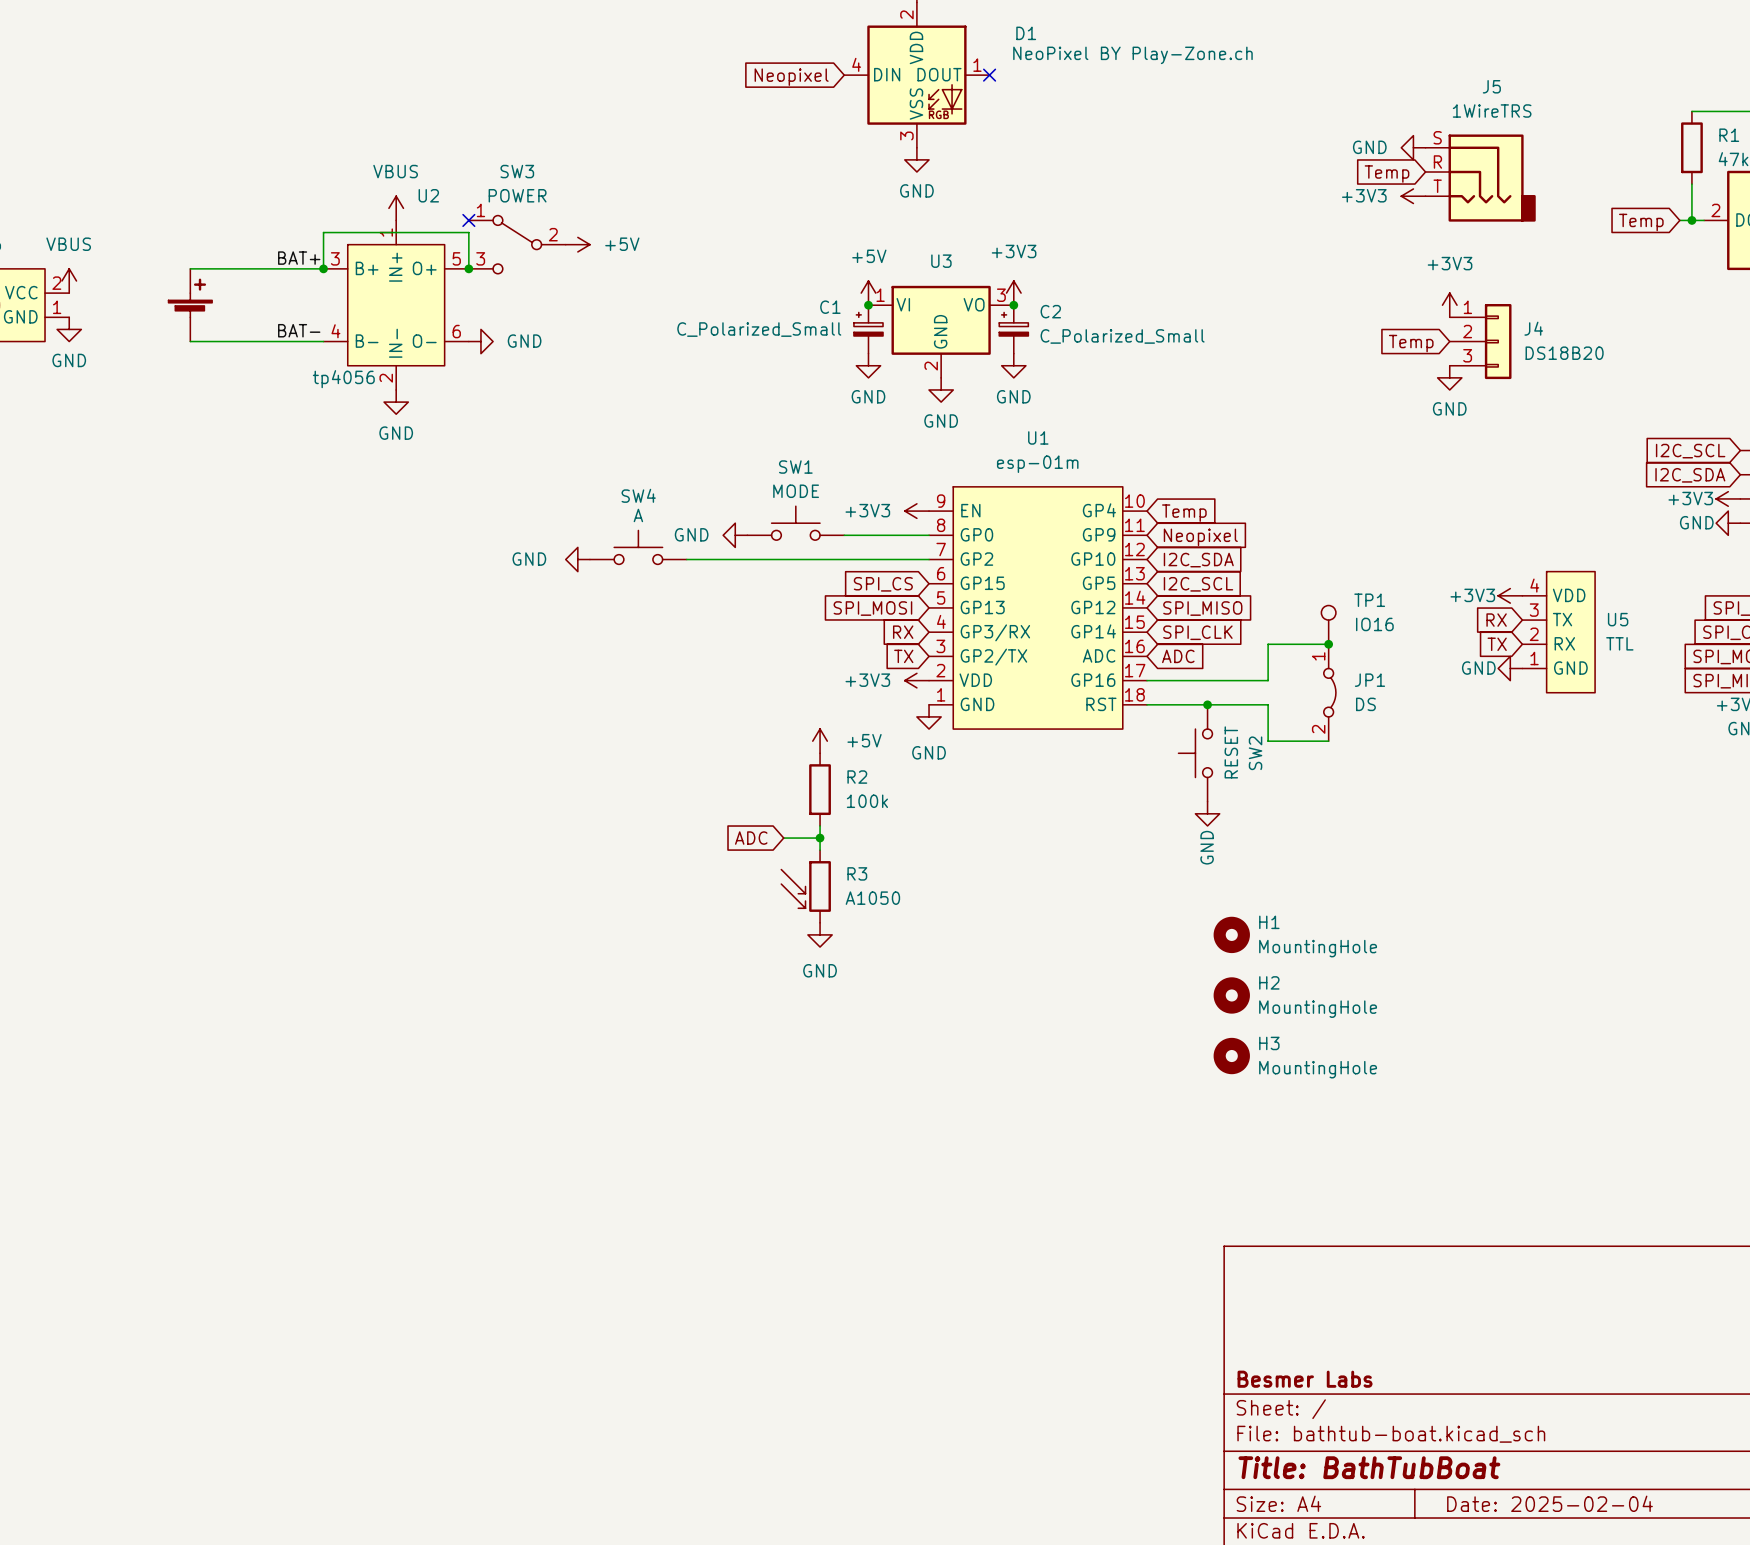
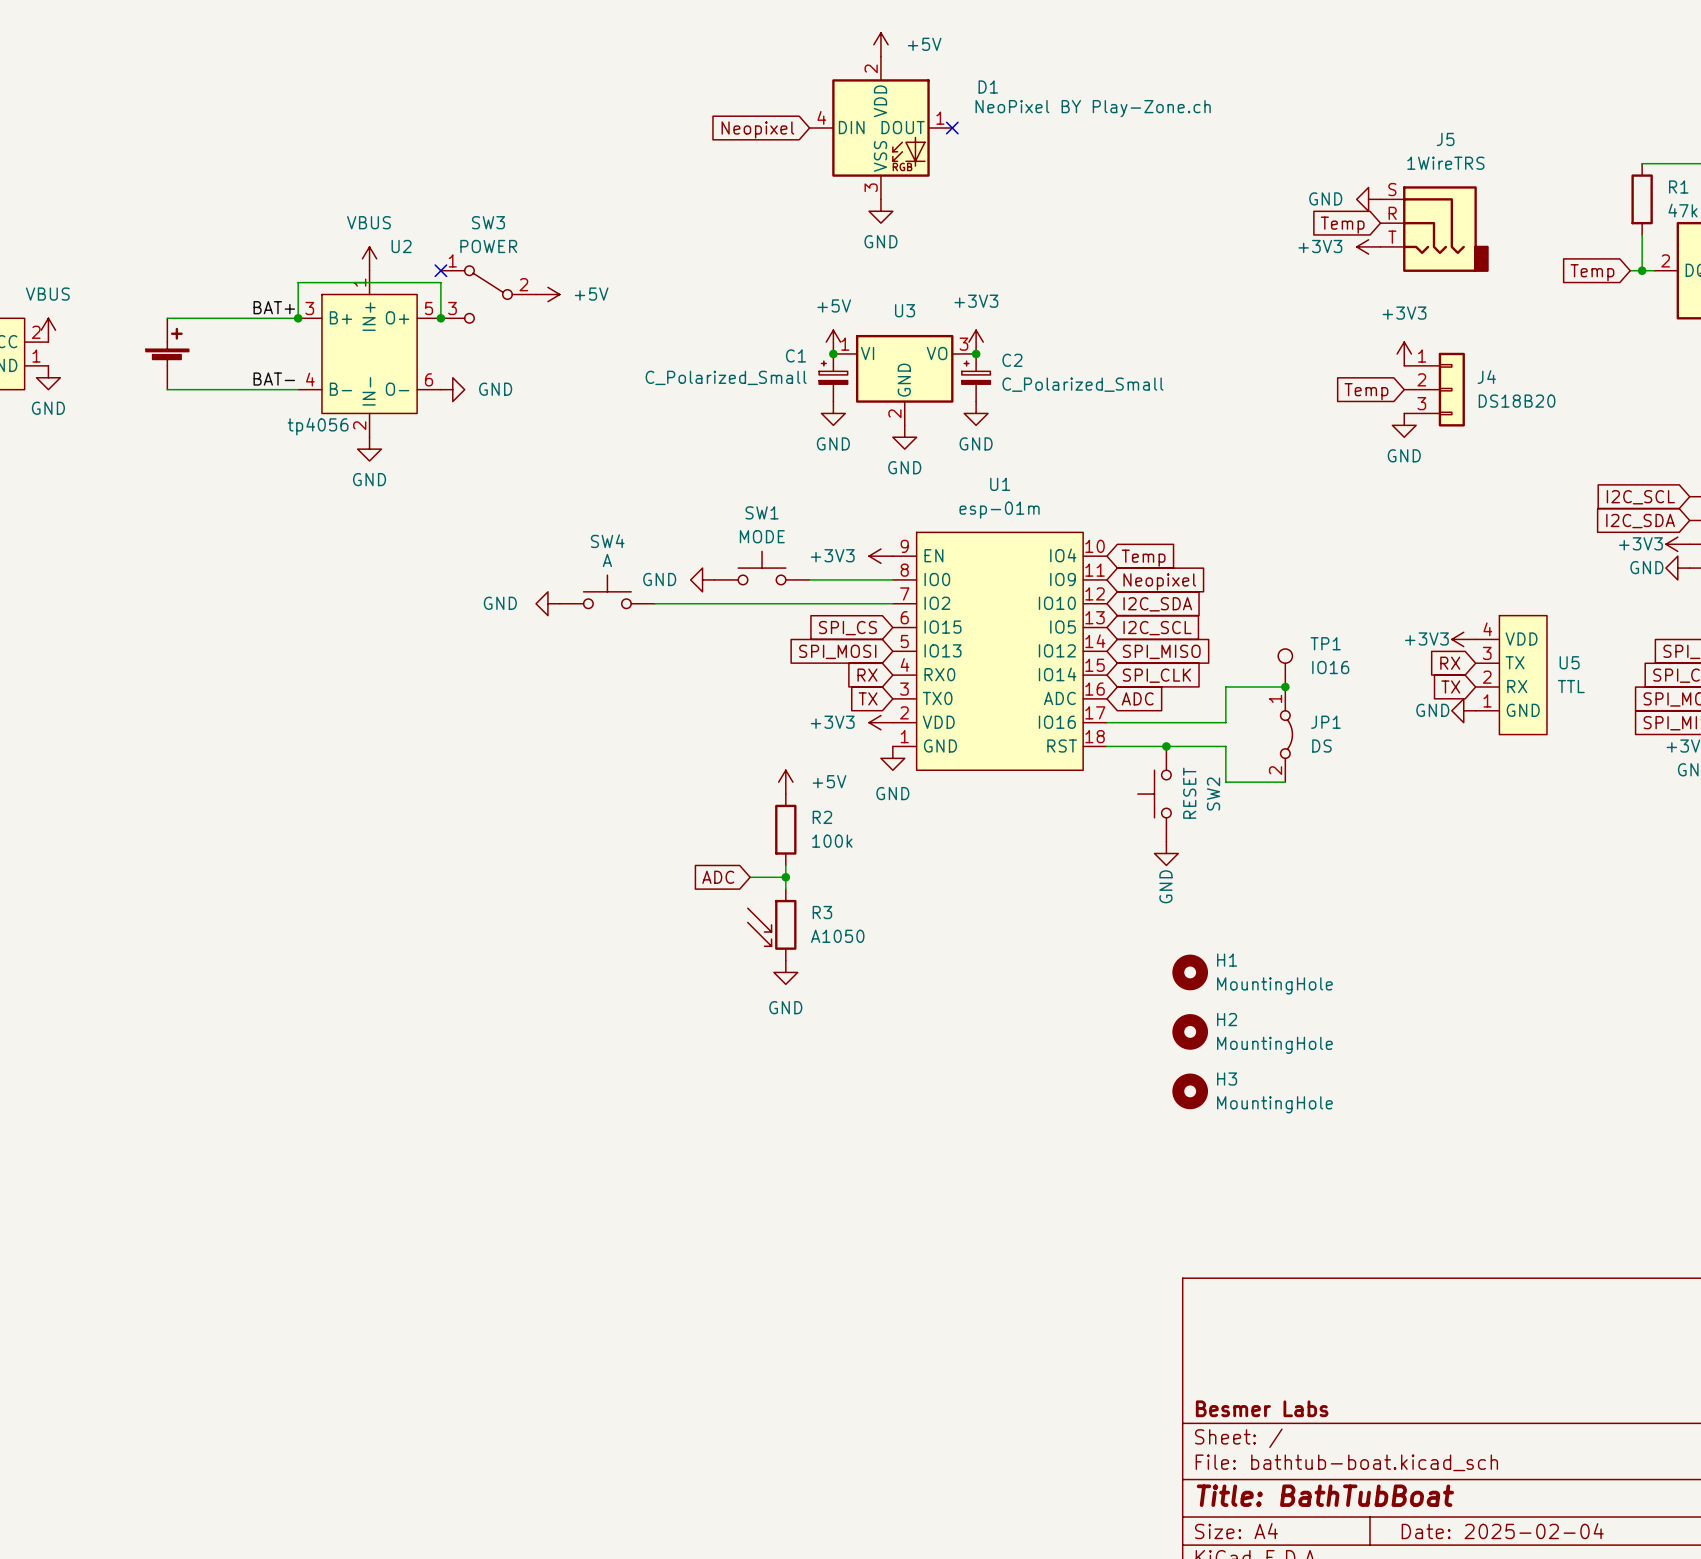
U1 symbol: [929, 486, 1148, 730] -> [892, 532, 1107, 771]

